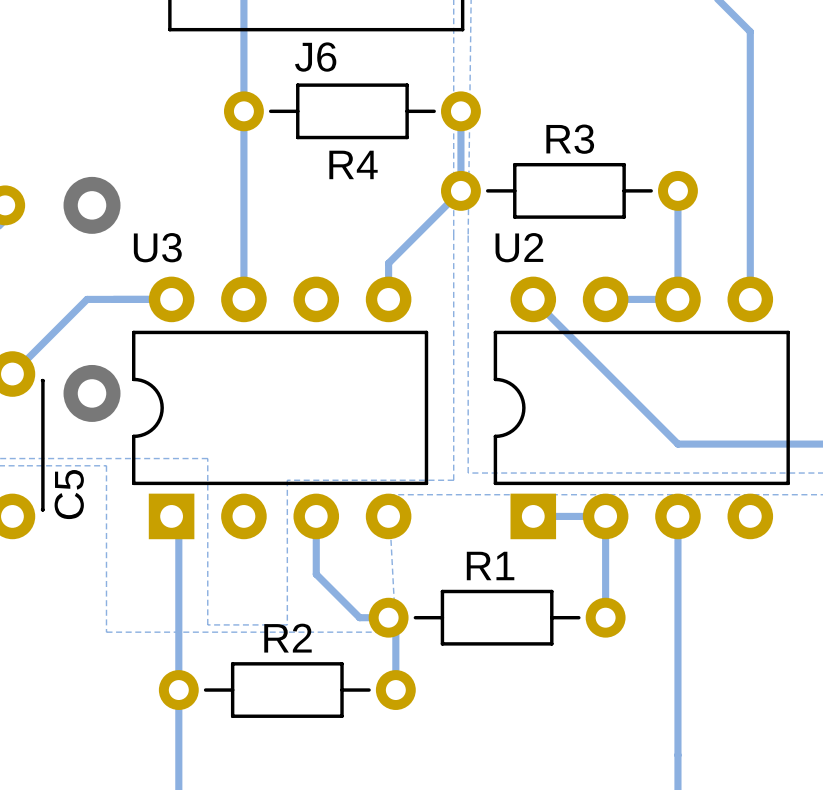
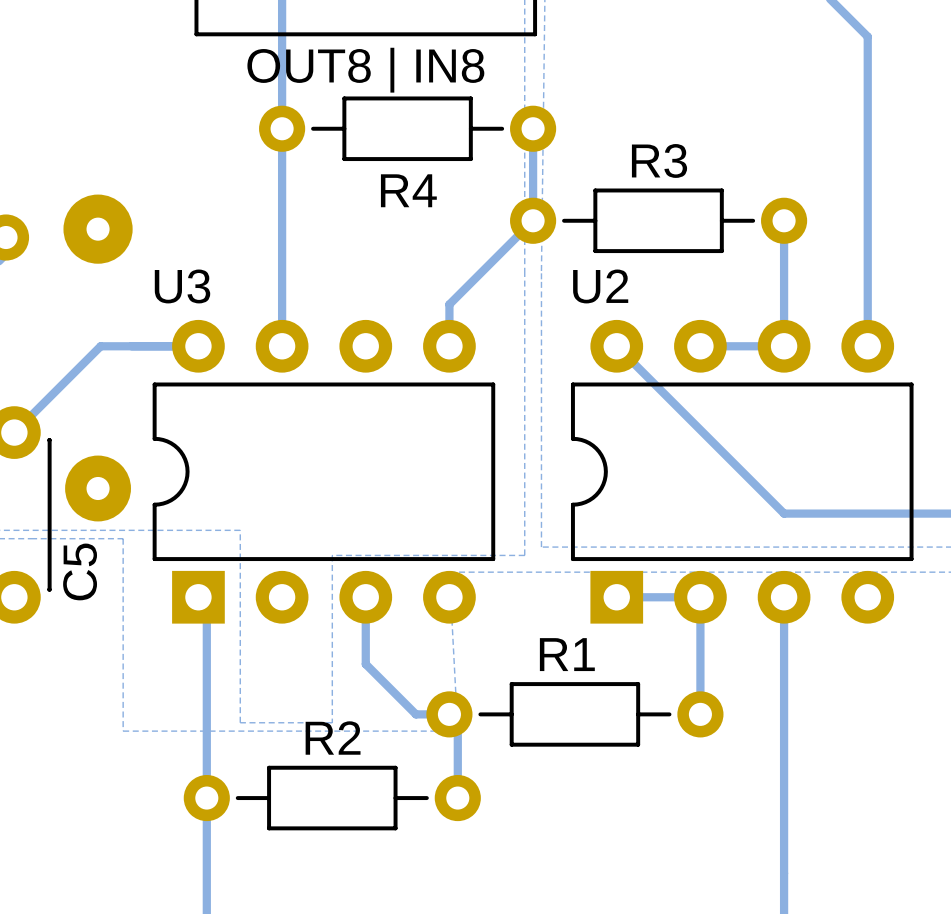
J6 name: J6 (315, 57) -> OUT8 | IN8 (365, 70)
part: none -> (98, 229)
via: (92, 205) -> none
via: (92, 393) -> none
part: none -> (98, 488)

